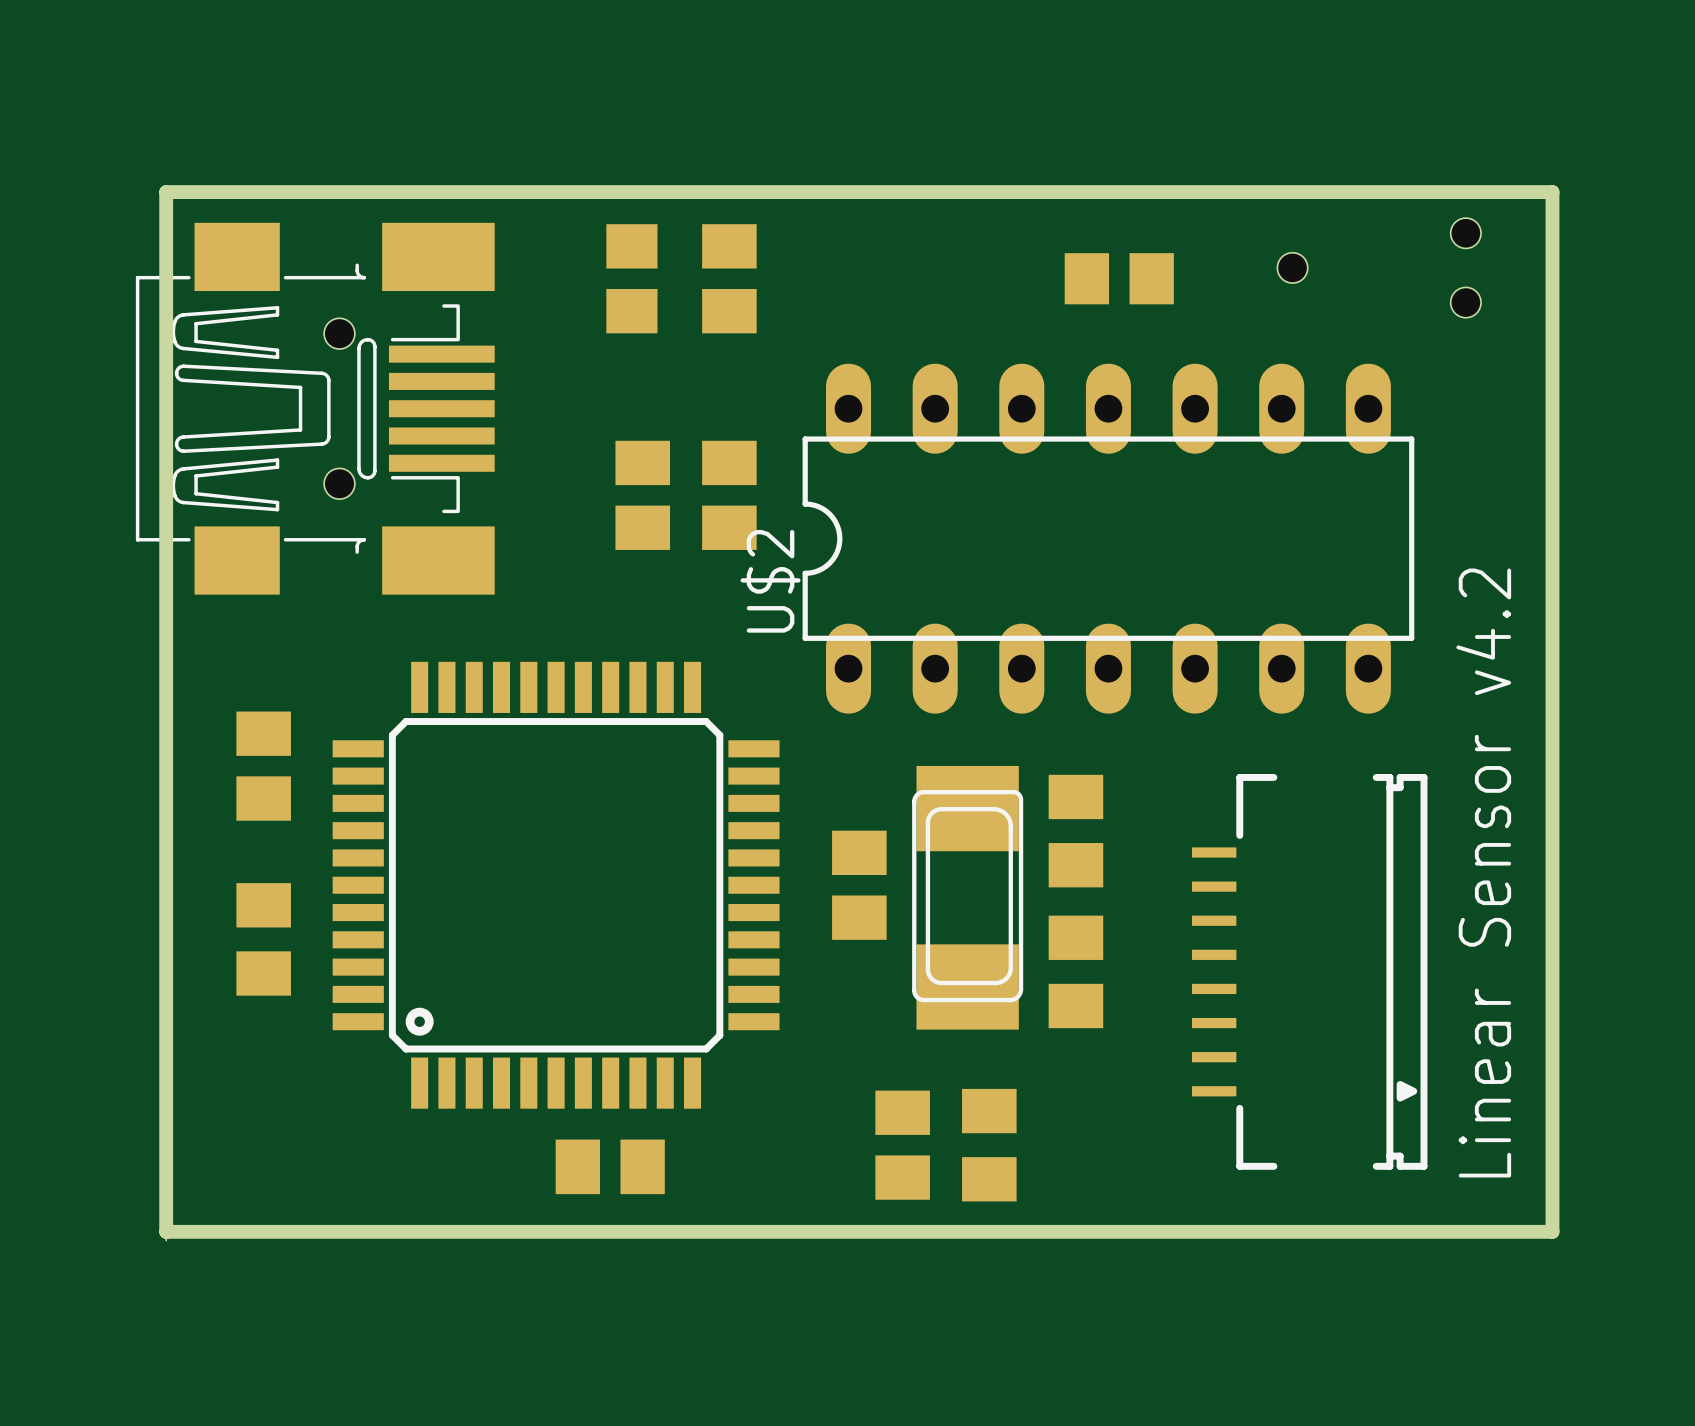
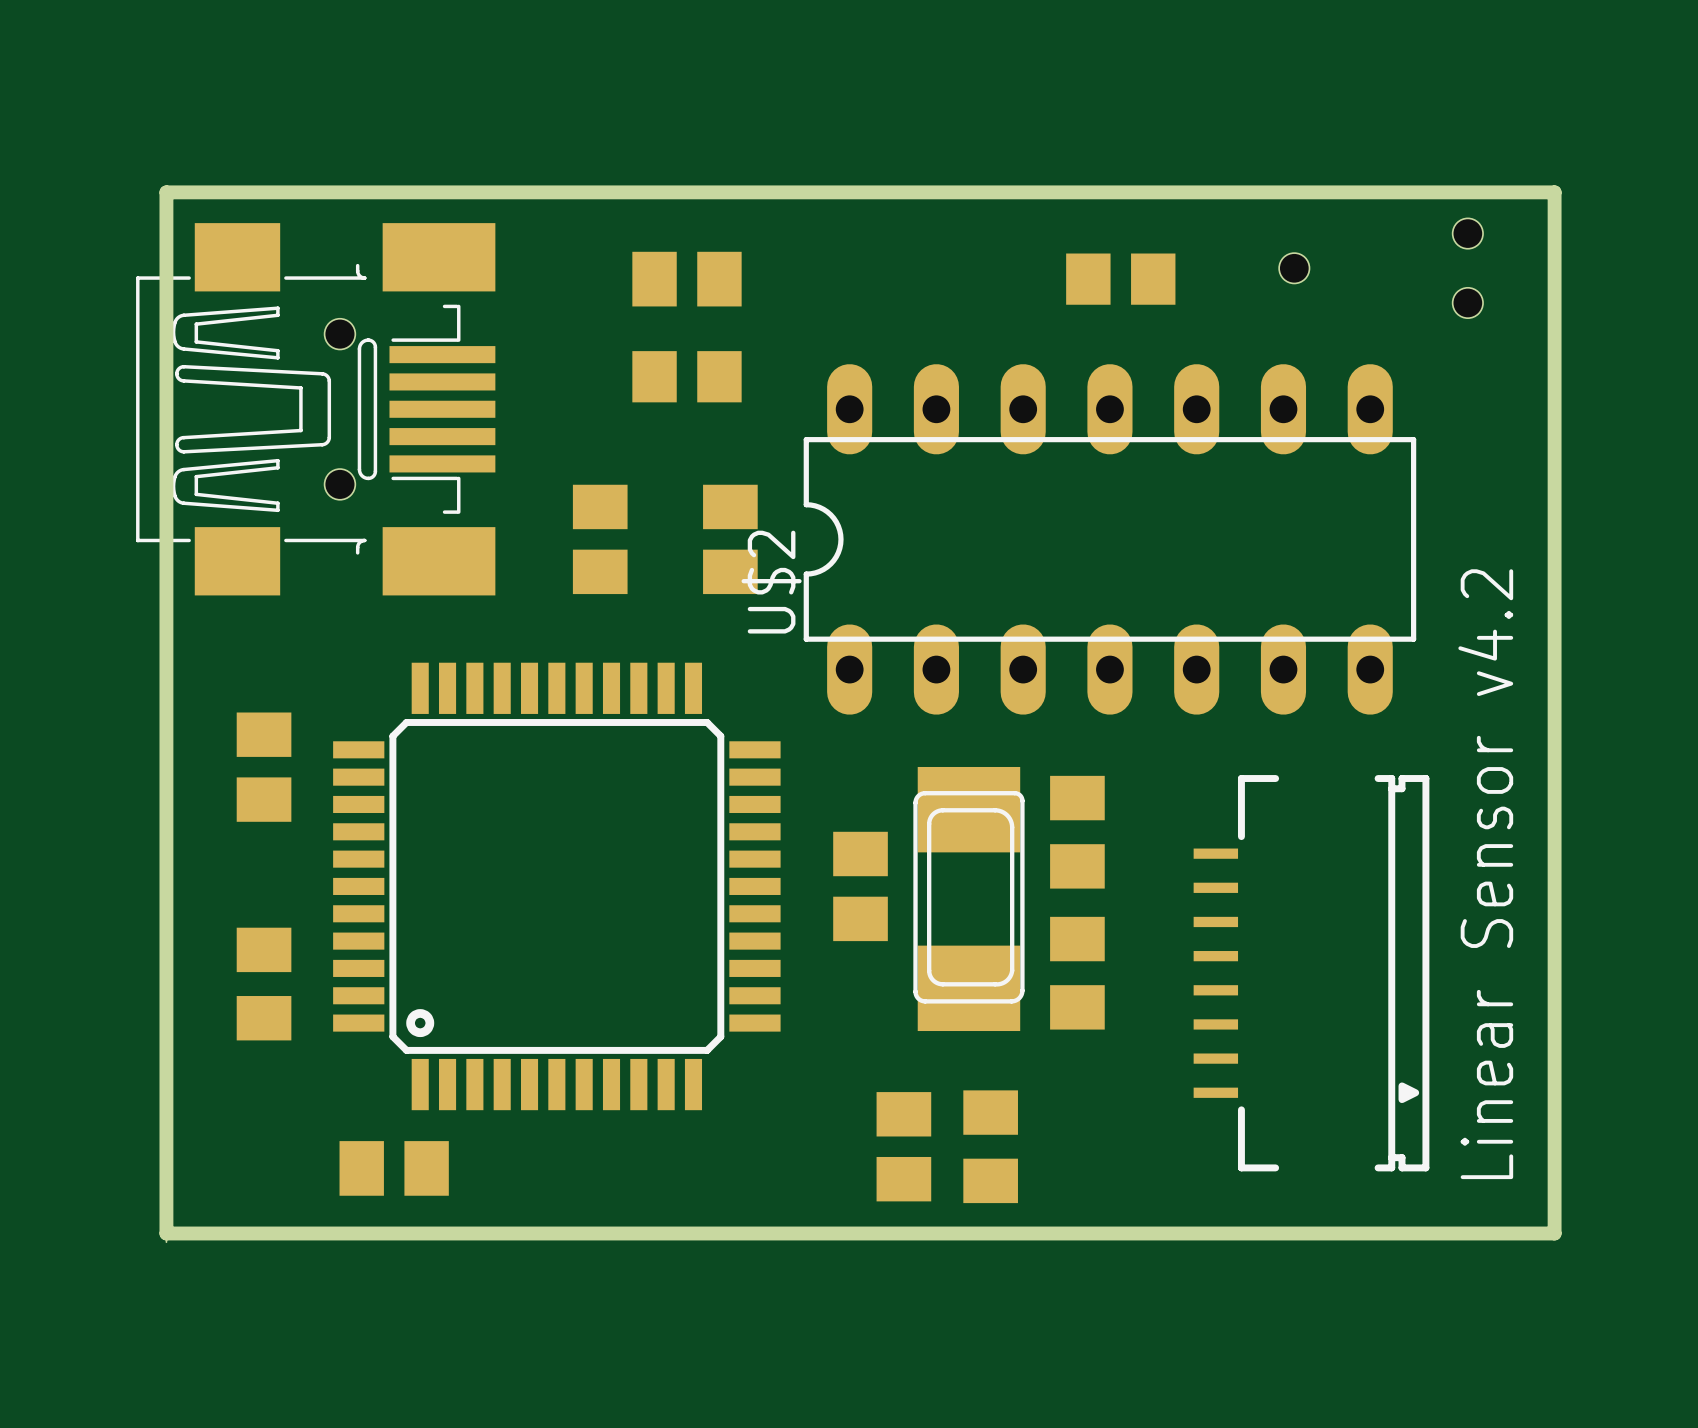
part rotation: 0° (631, 278) -> 90° clockwise (686, 376)
part position: (631, 278) -> (686, 376)
part rotation: 0° (729, 278) -> 90° clockwise (686, 279)
part: (642, 495) -> none
part position: (729, 495) -> (730, 539)
part: none -> (600, 539)
part position: (263, 939) -> (264, 984)
part position: (610, 1166) -> (394, 1168)

